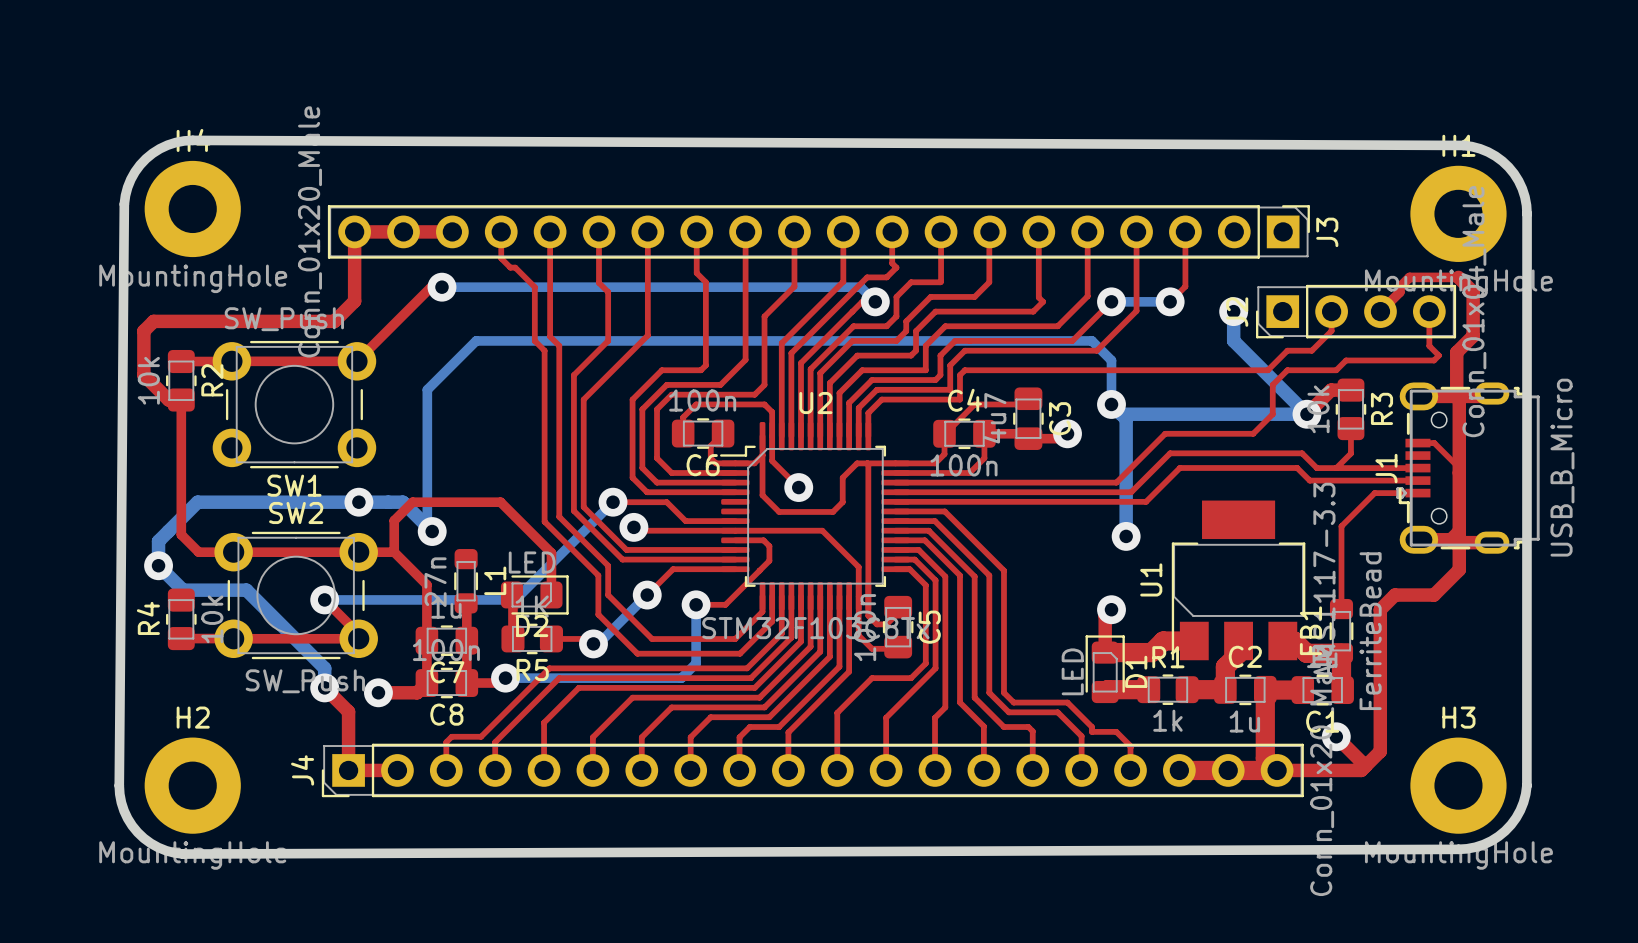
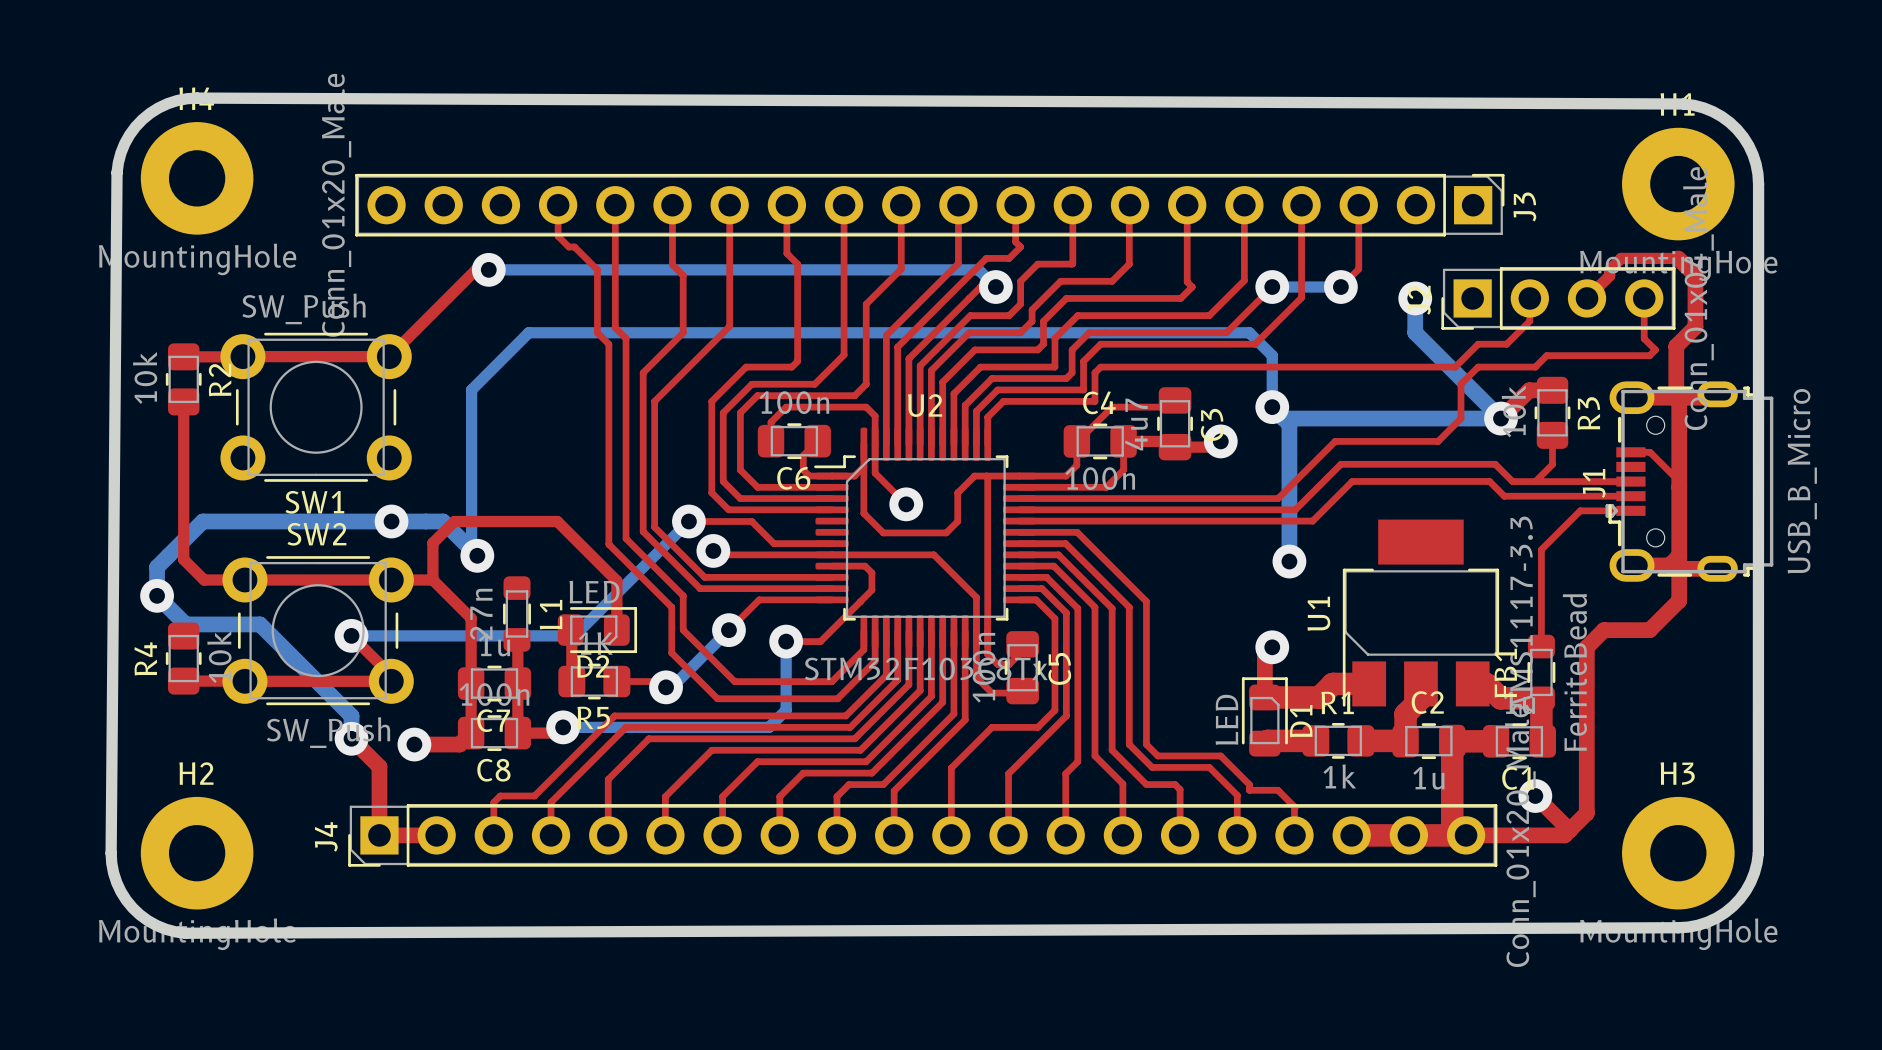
top track: (452, 231) (354, 231) (354, 301) (334, 321) (153, 321) (143, 331) (143, 375) (168, 400) (181, 400) -> none

